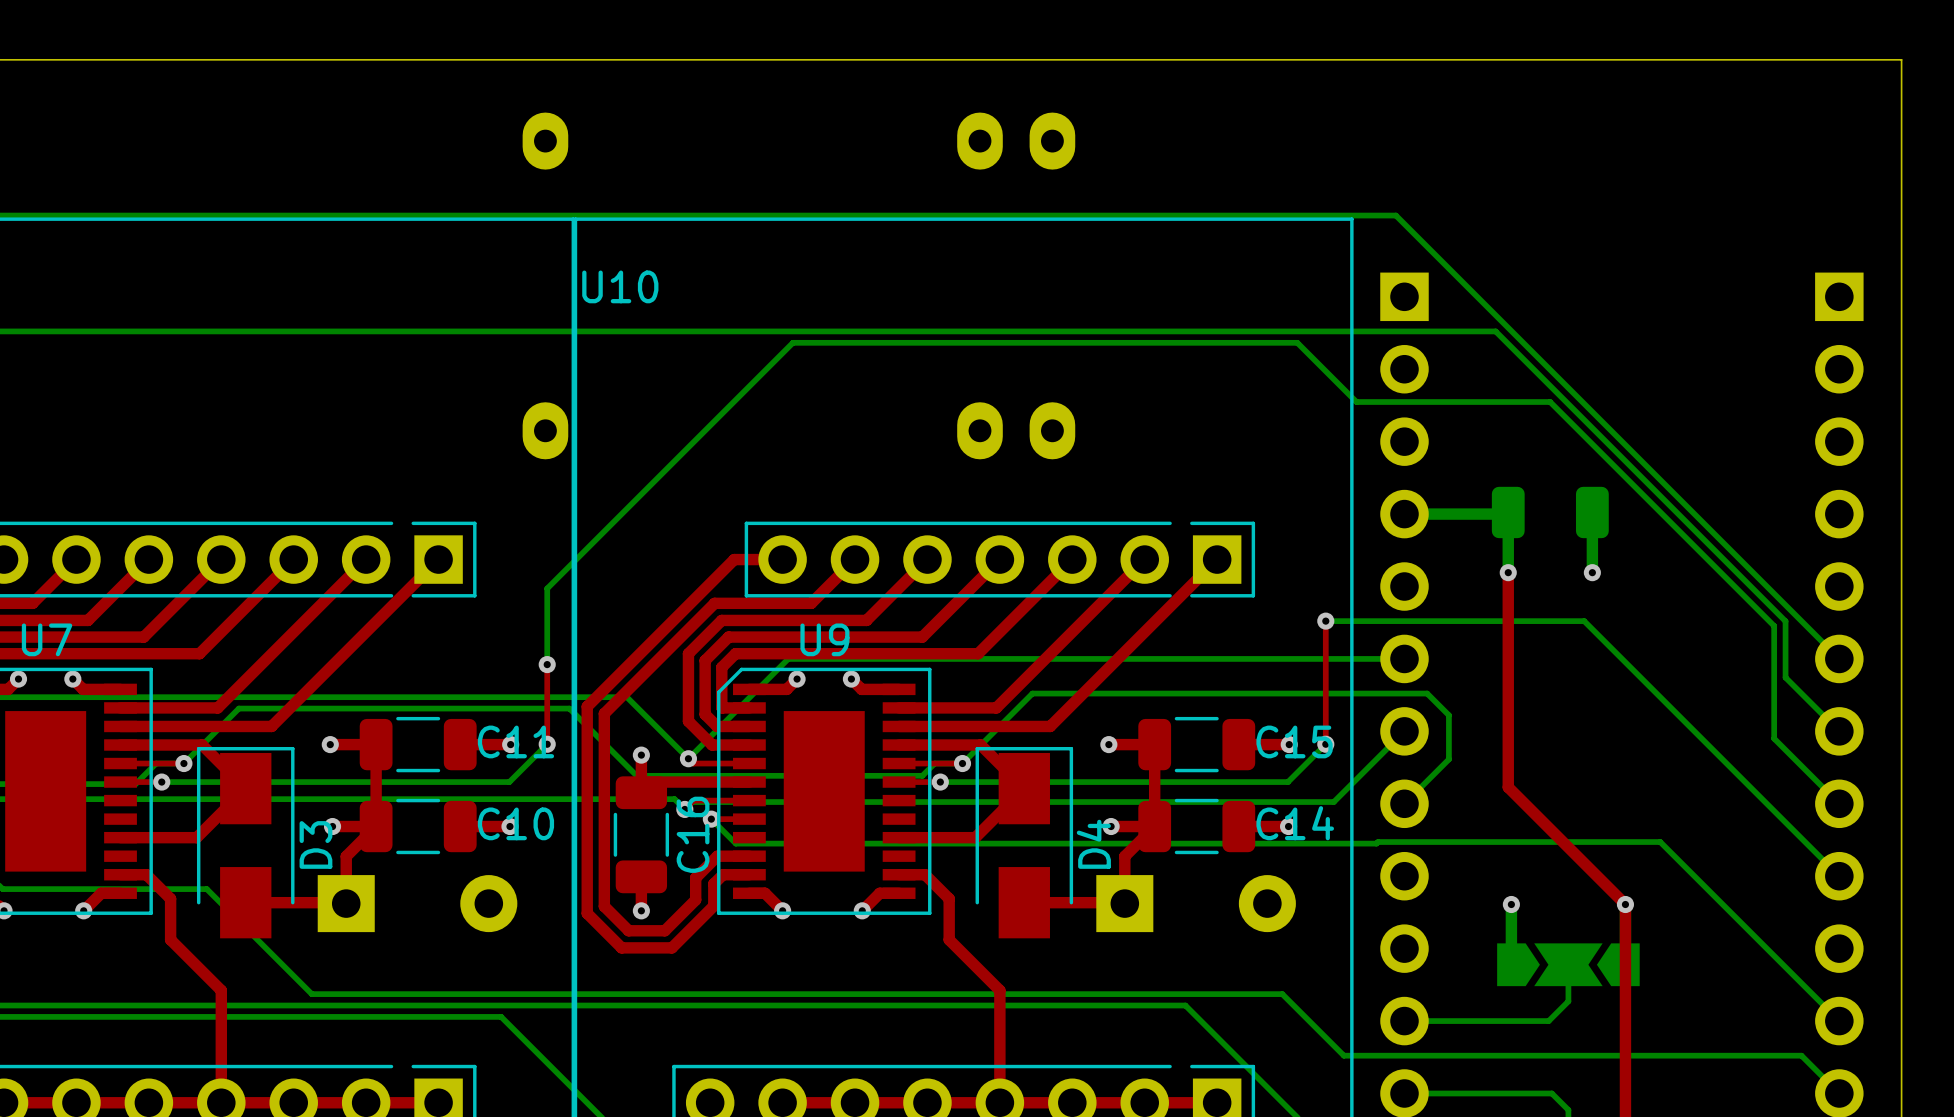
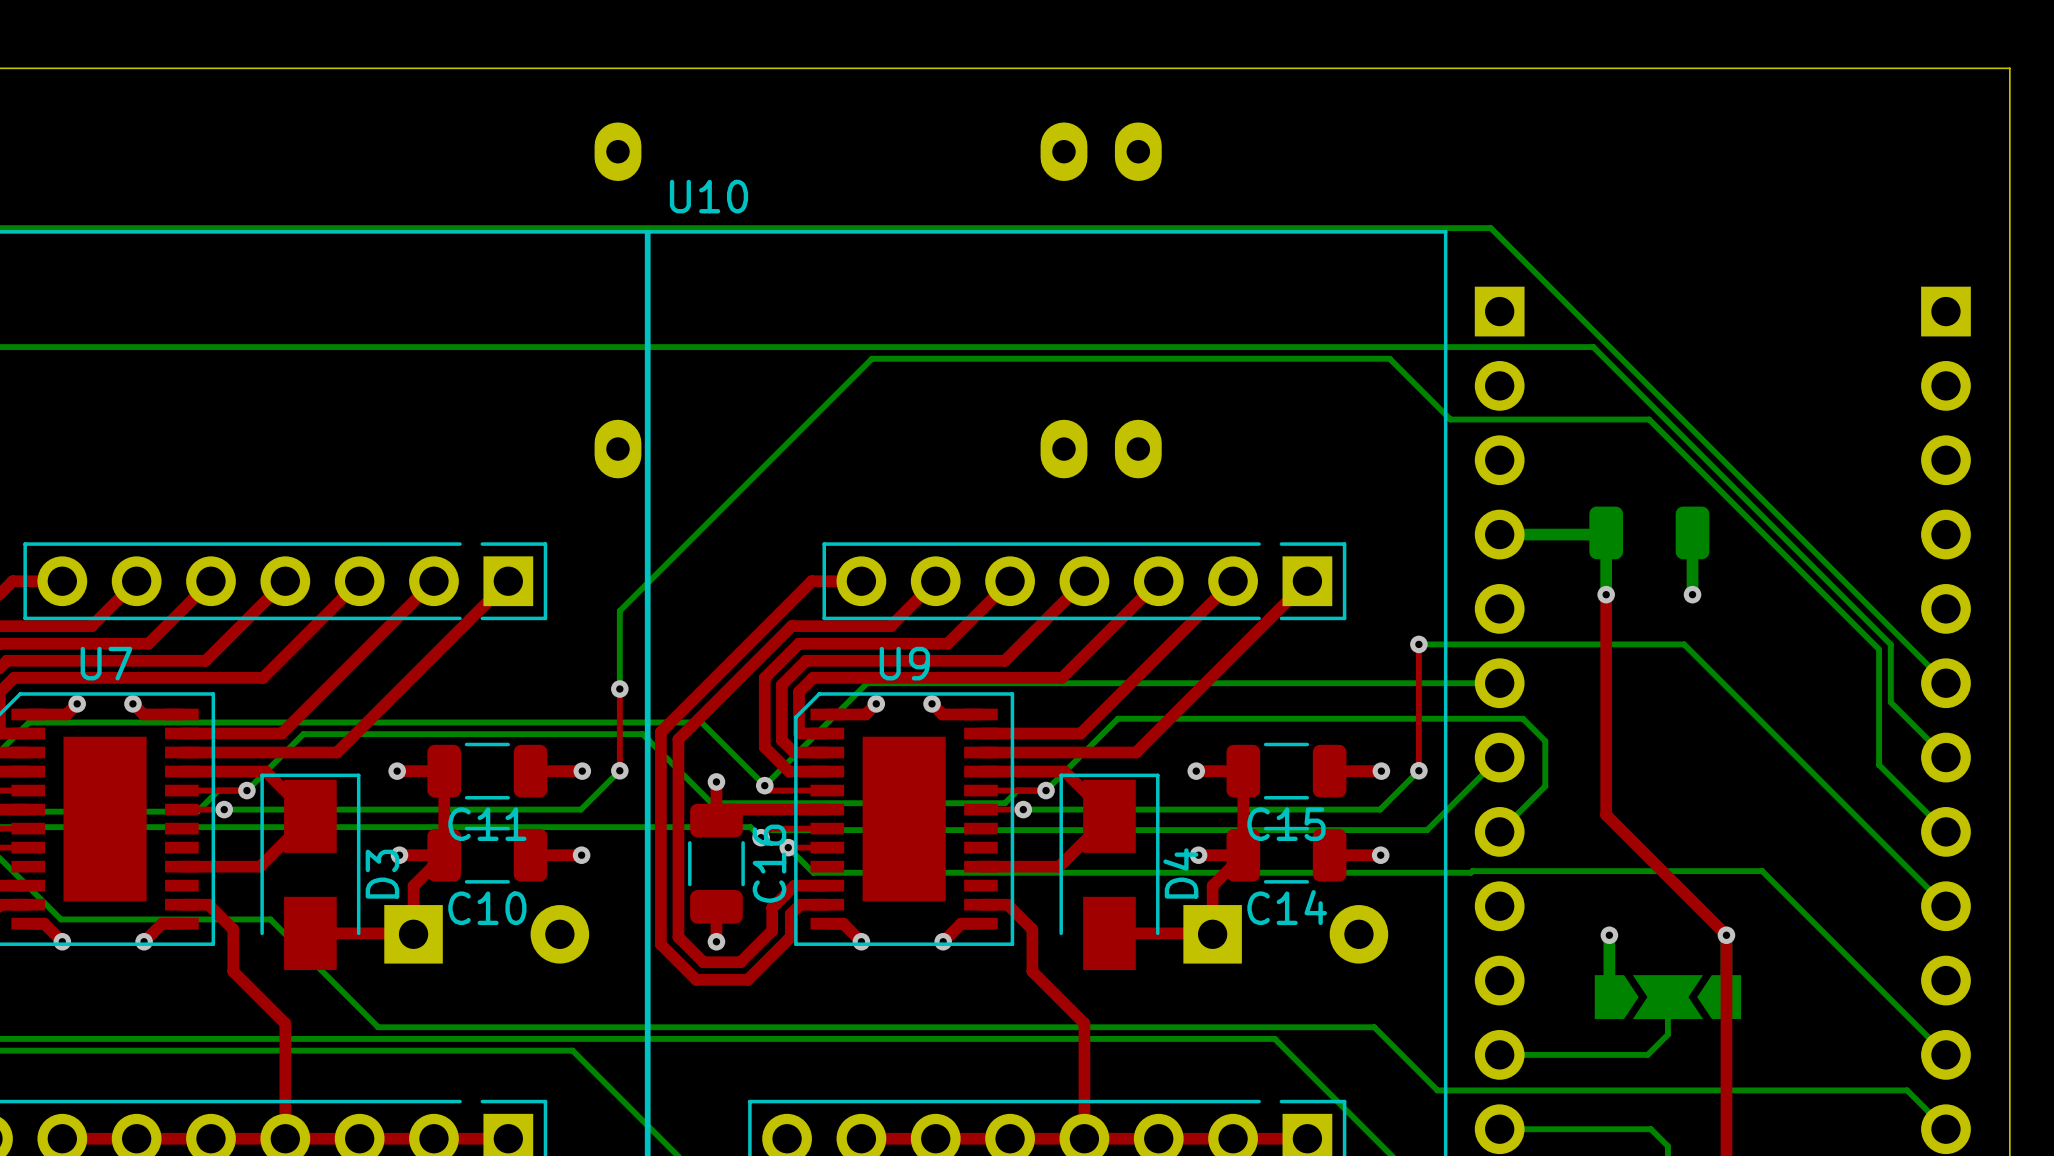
U10 name position: U10 (620, 286) -> U10 (708, 196)
C11 name position: C11 (515, 741) -> C11 (487, 824)
C15 name position: C15 (1294, 741) -> C15 (1286, 824)
C10 name position: C10 (515, 823) -> C10 (487, 908)
C14 name position: C14 (1295, 823) -> C14 (1287, 907)

